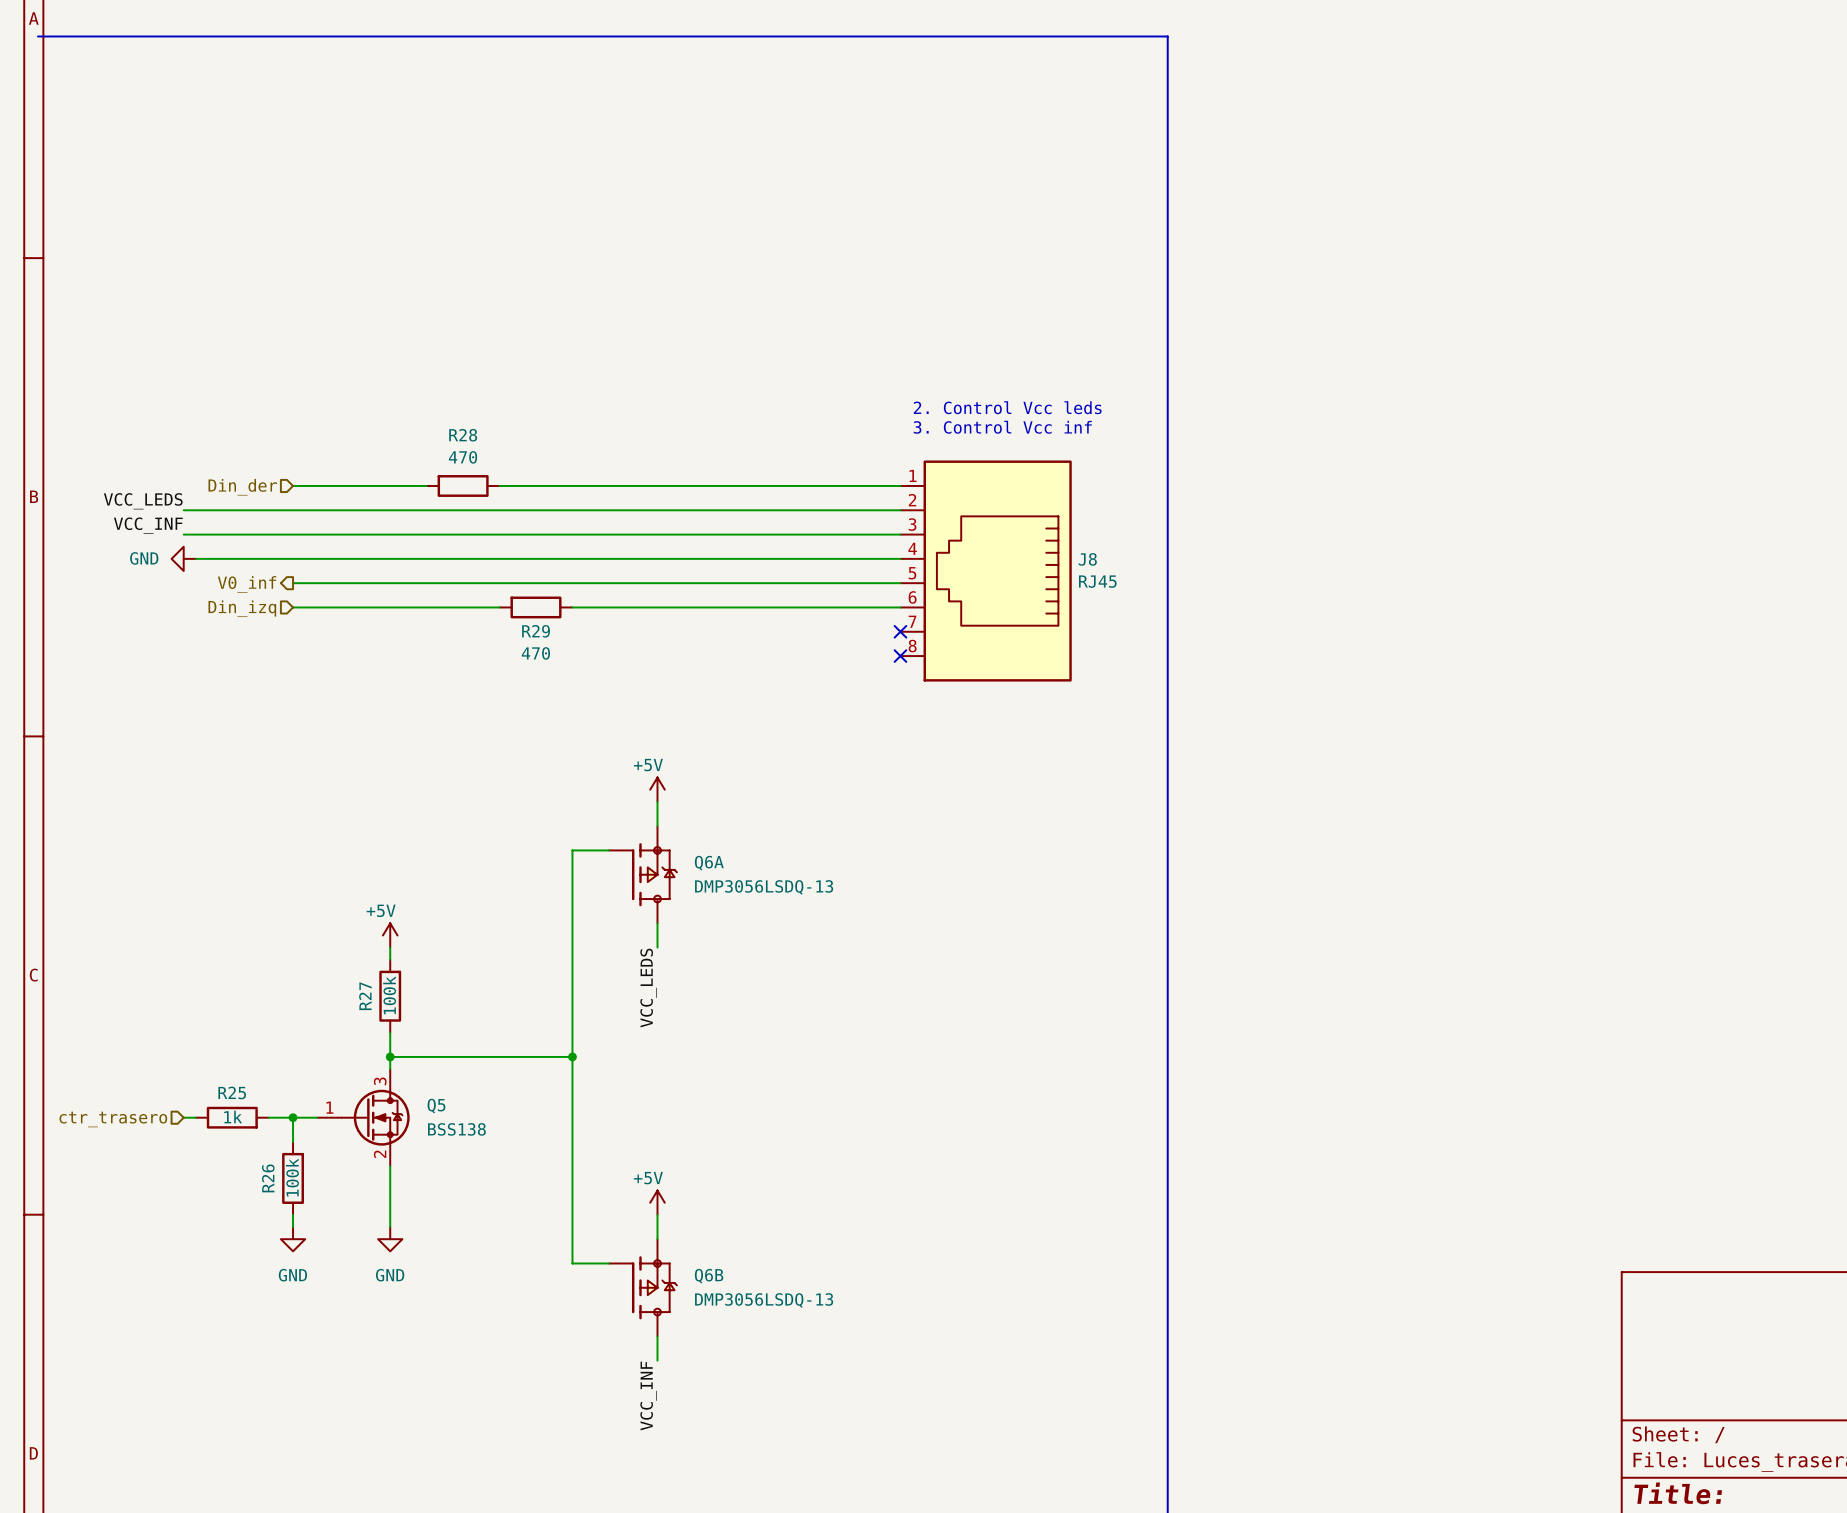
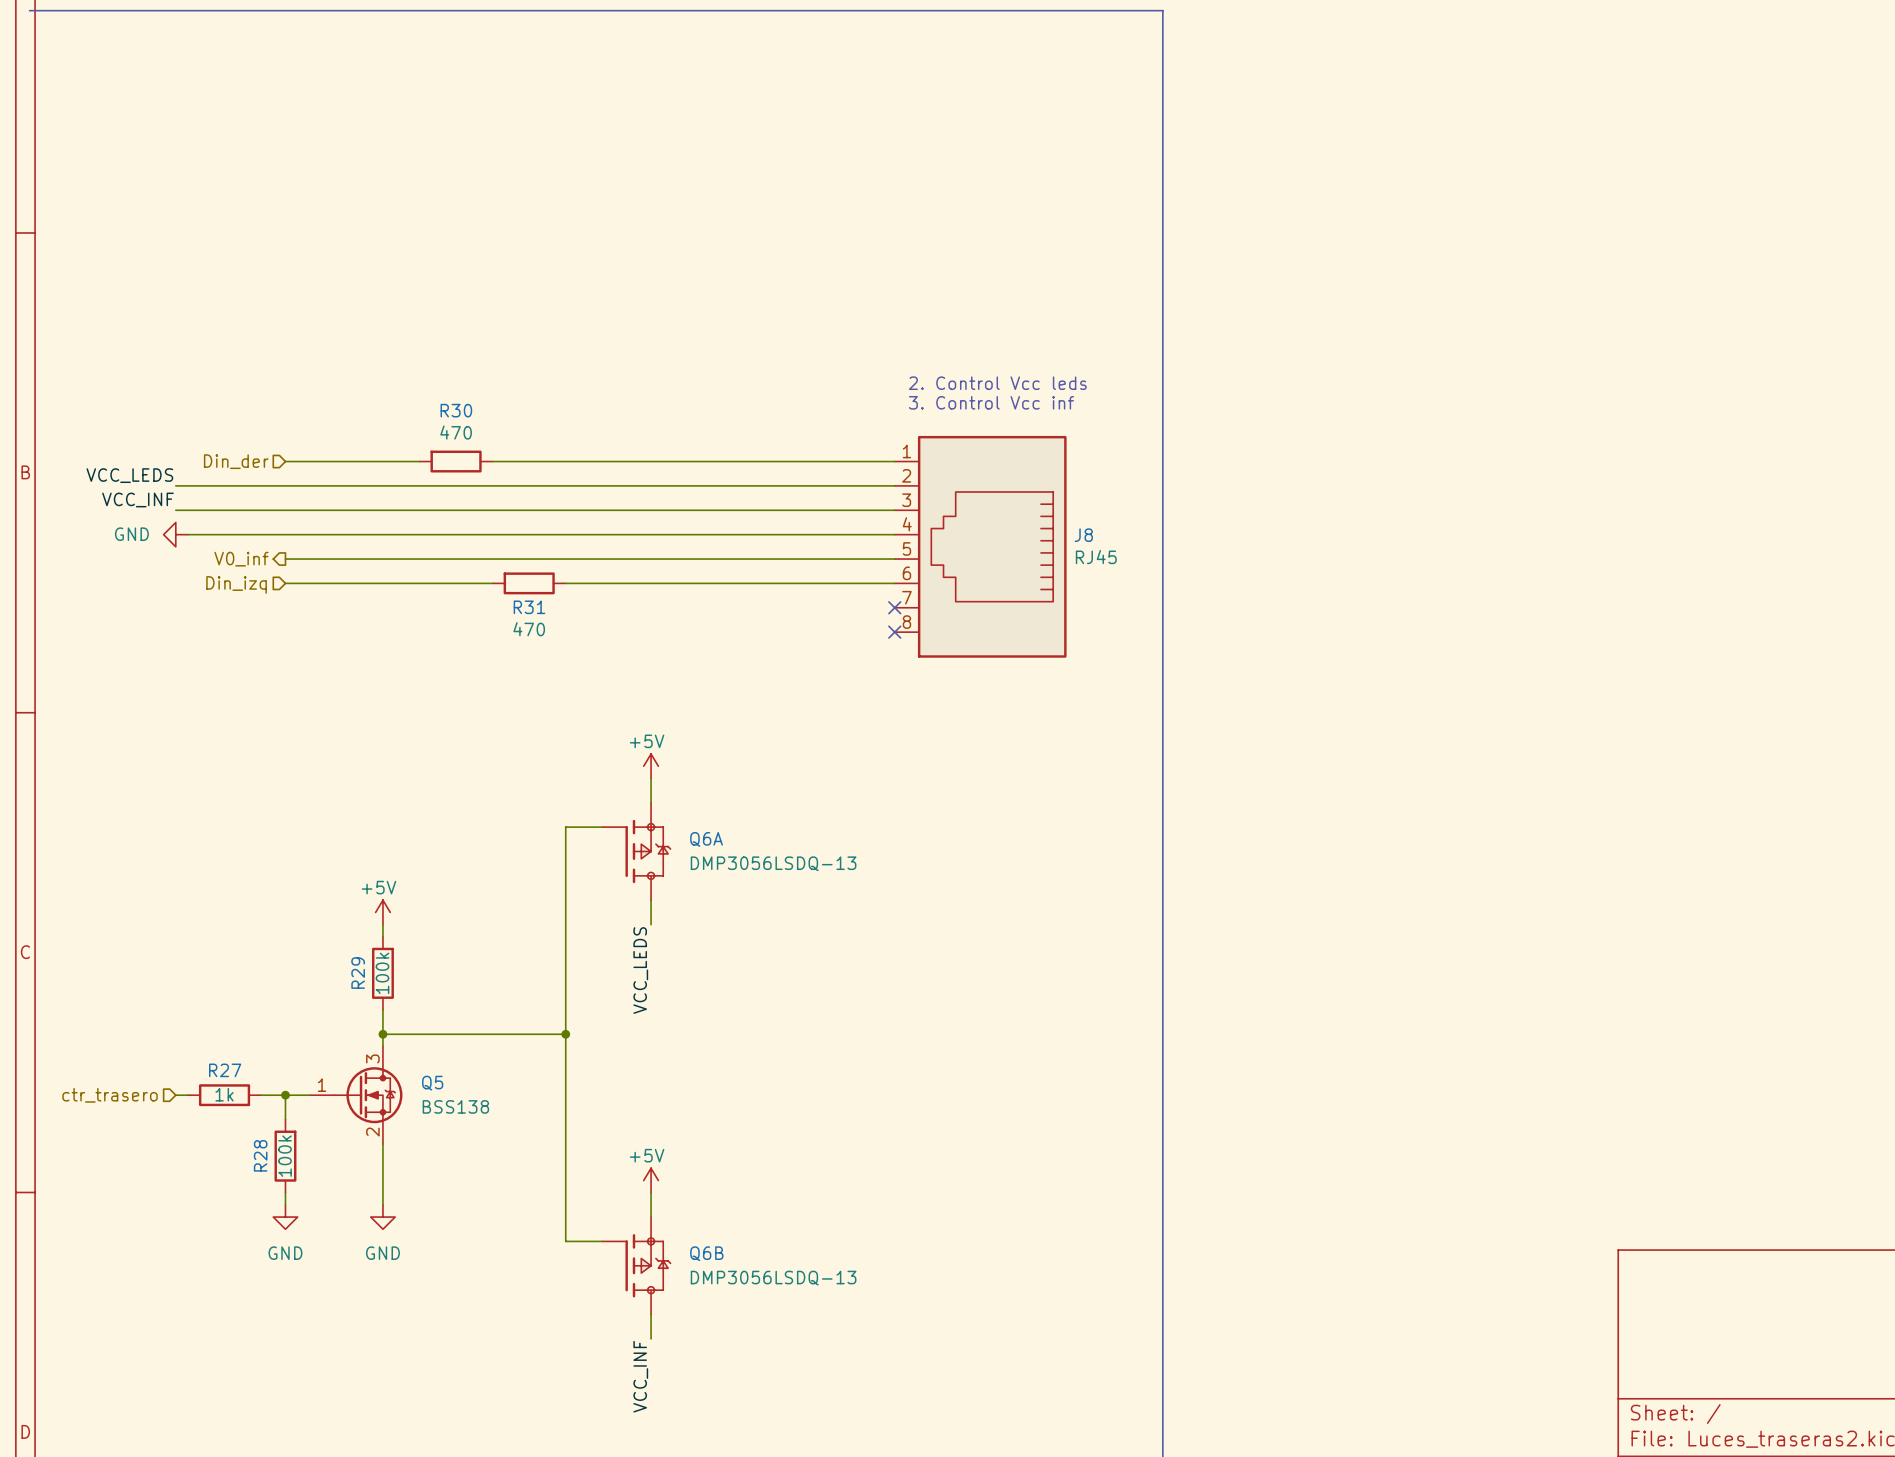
R28 name: R28 (463, 435) -> R30 (456, 410)
R29 name: R29 (536, 631) -> R31 (529, 607)
R27 name: R27 (365, 996) -> R29 (358, 973)
R25 name: R25 (232, 1092) -> R27 (225, 1070)
R26 name: R26 (268, 1178) -> R28 (260, 1155)

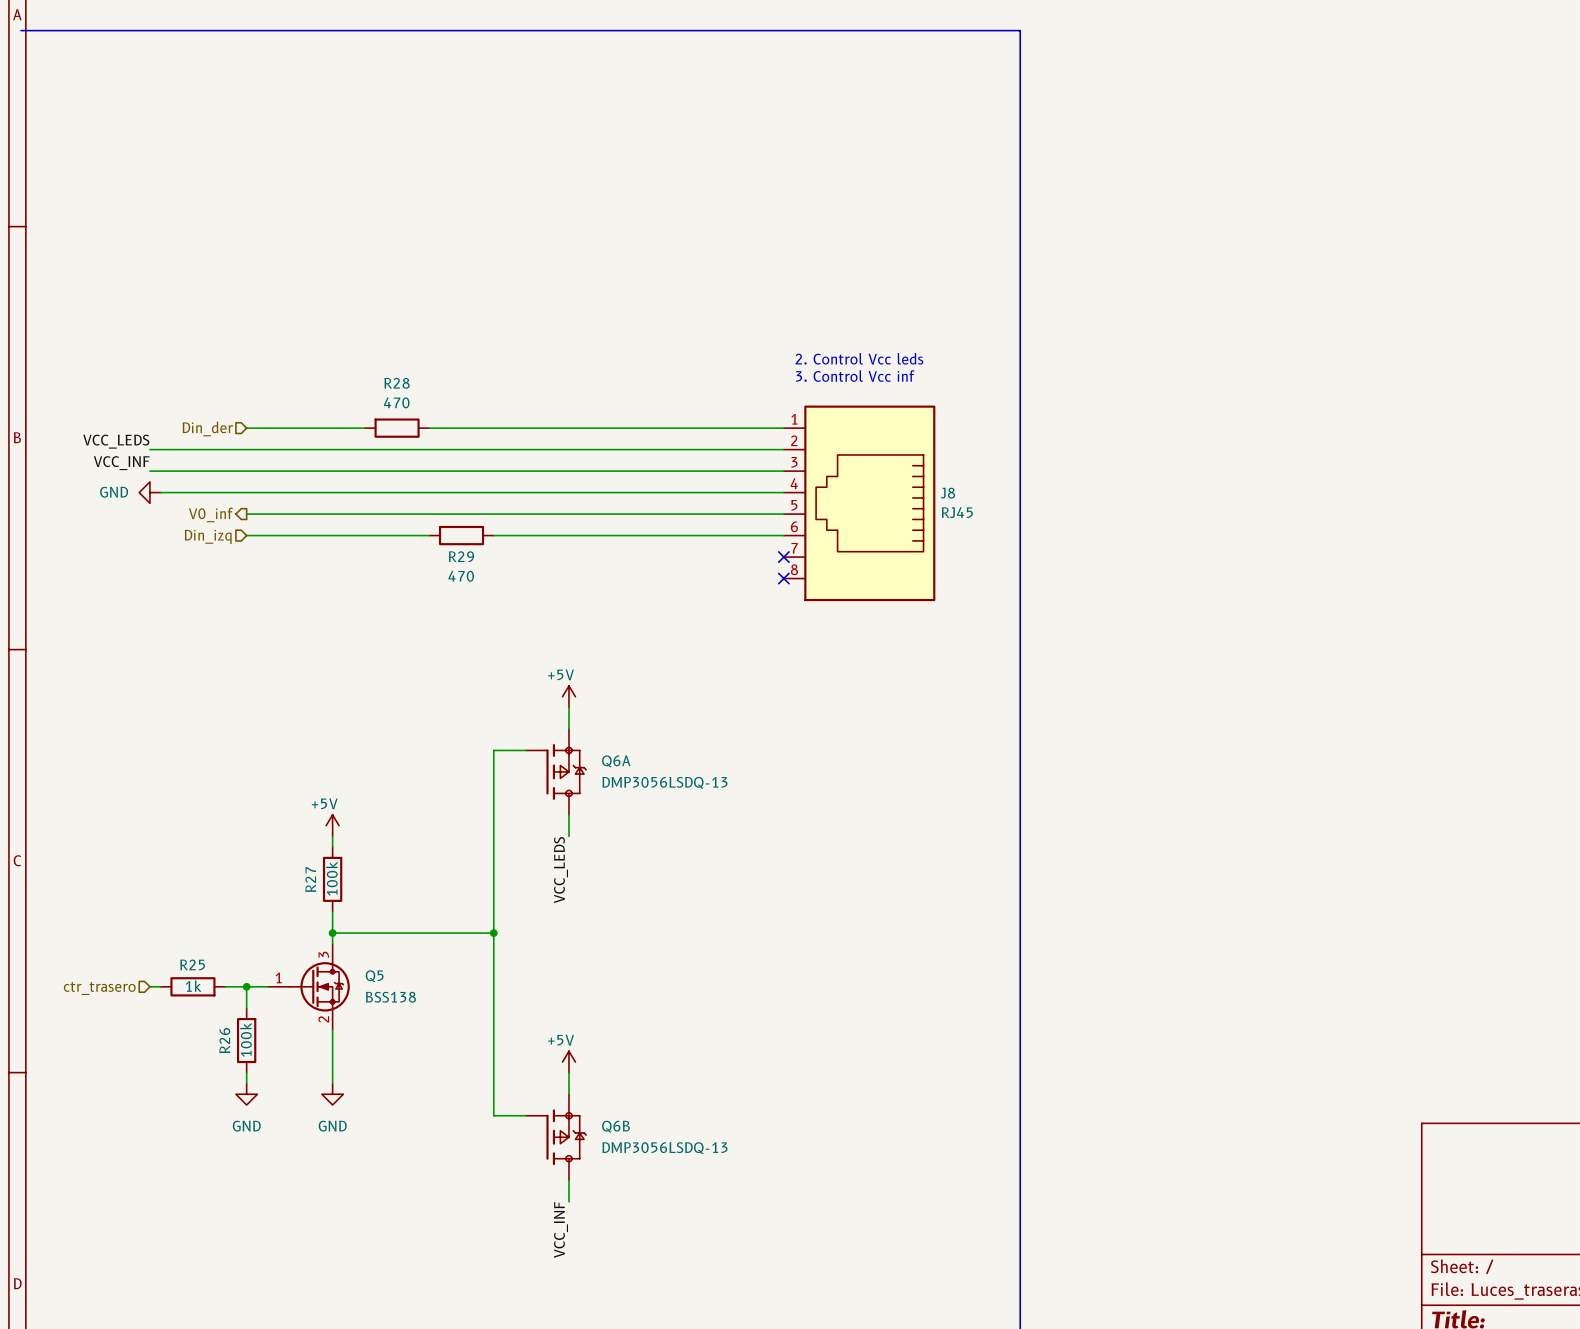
R30 name: R30 (456, 410) -> R28 (397, 383)
R31 name: R31 (529, 607) -> R29 (461, 556)
R29 name: R29 (358, 973) -> R27 (310, 879)
R27 name: R27 (225, 1070) -> R25 (192, 964)
R28 name: R28 (260, 1155) -> R26 (224, 1040)

